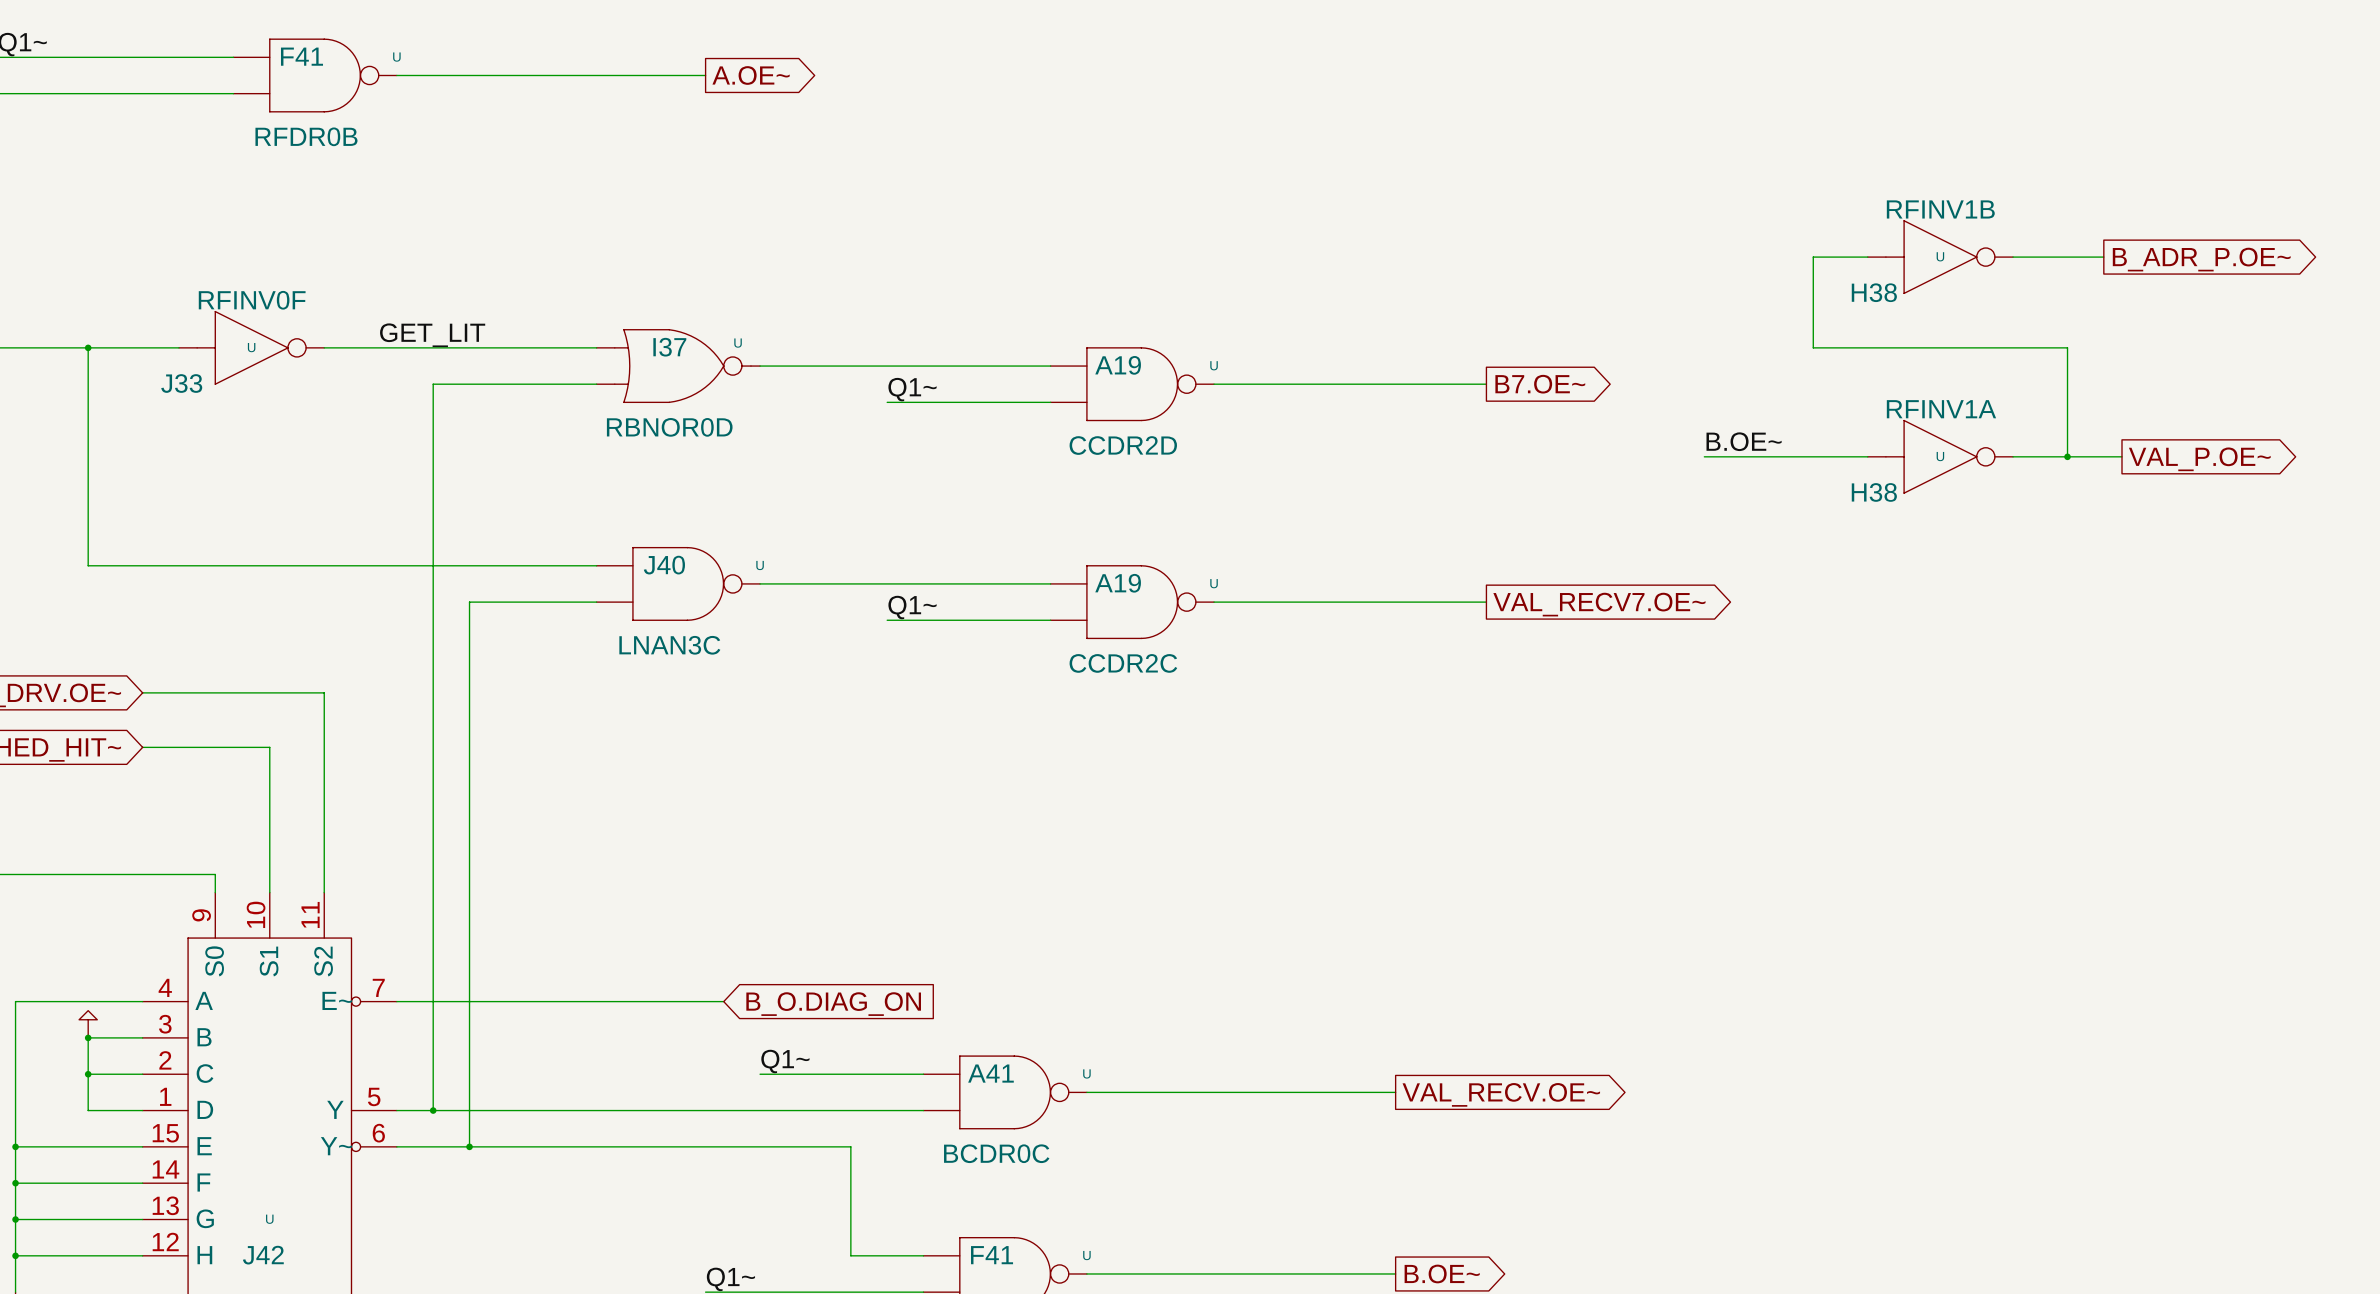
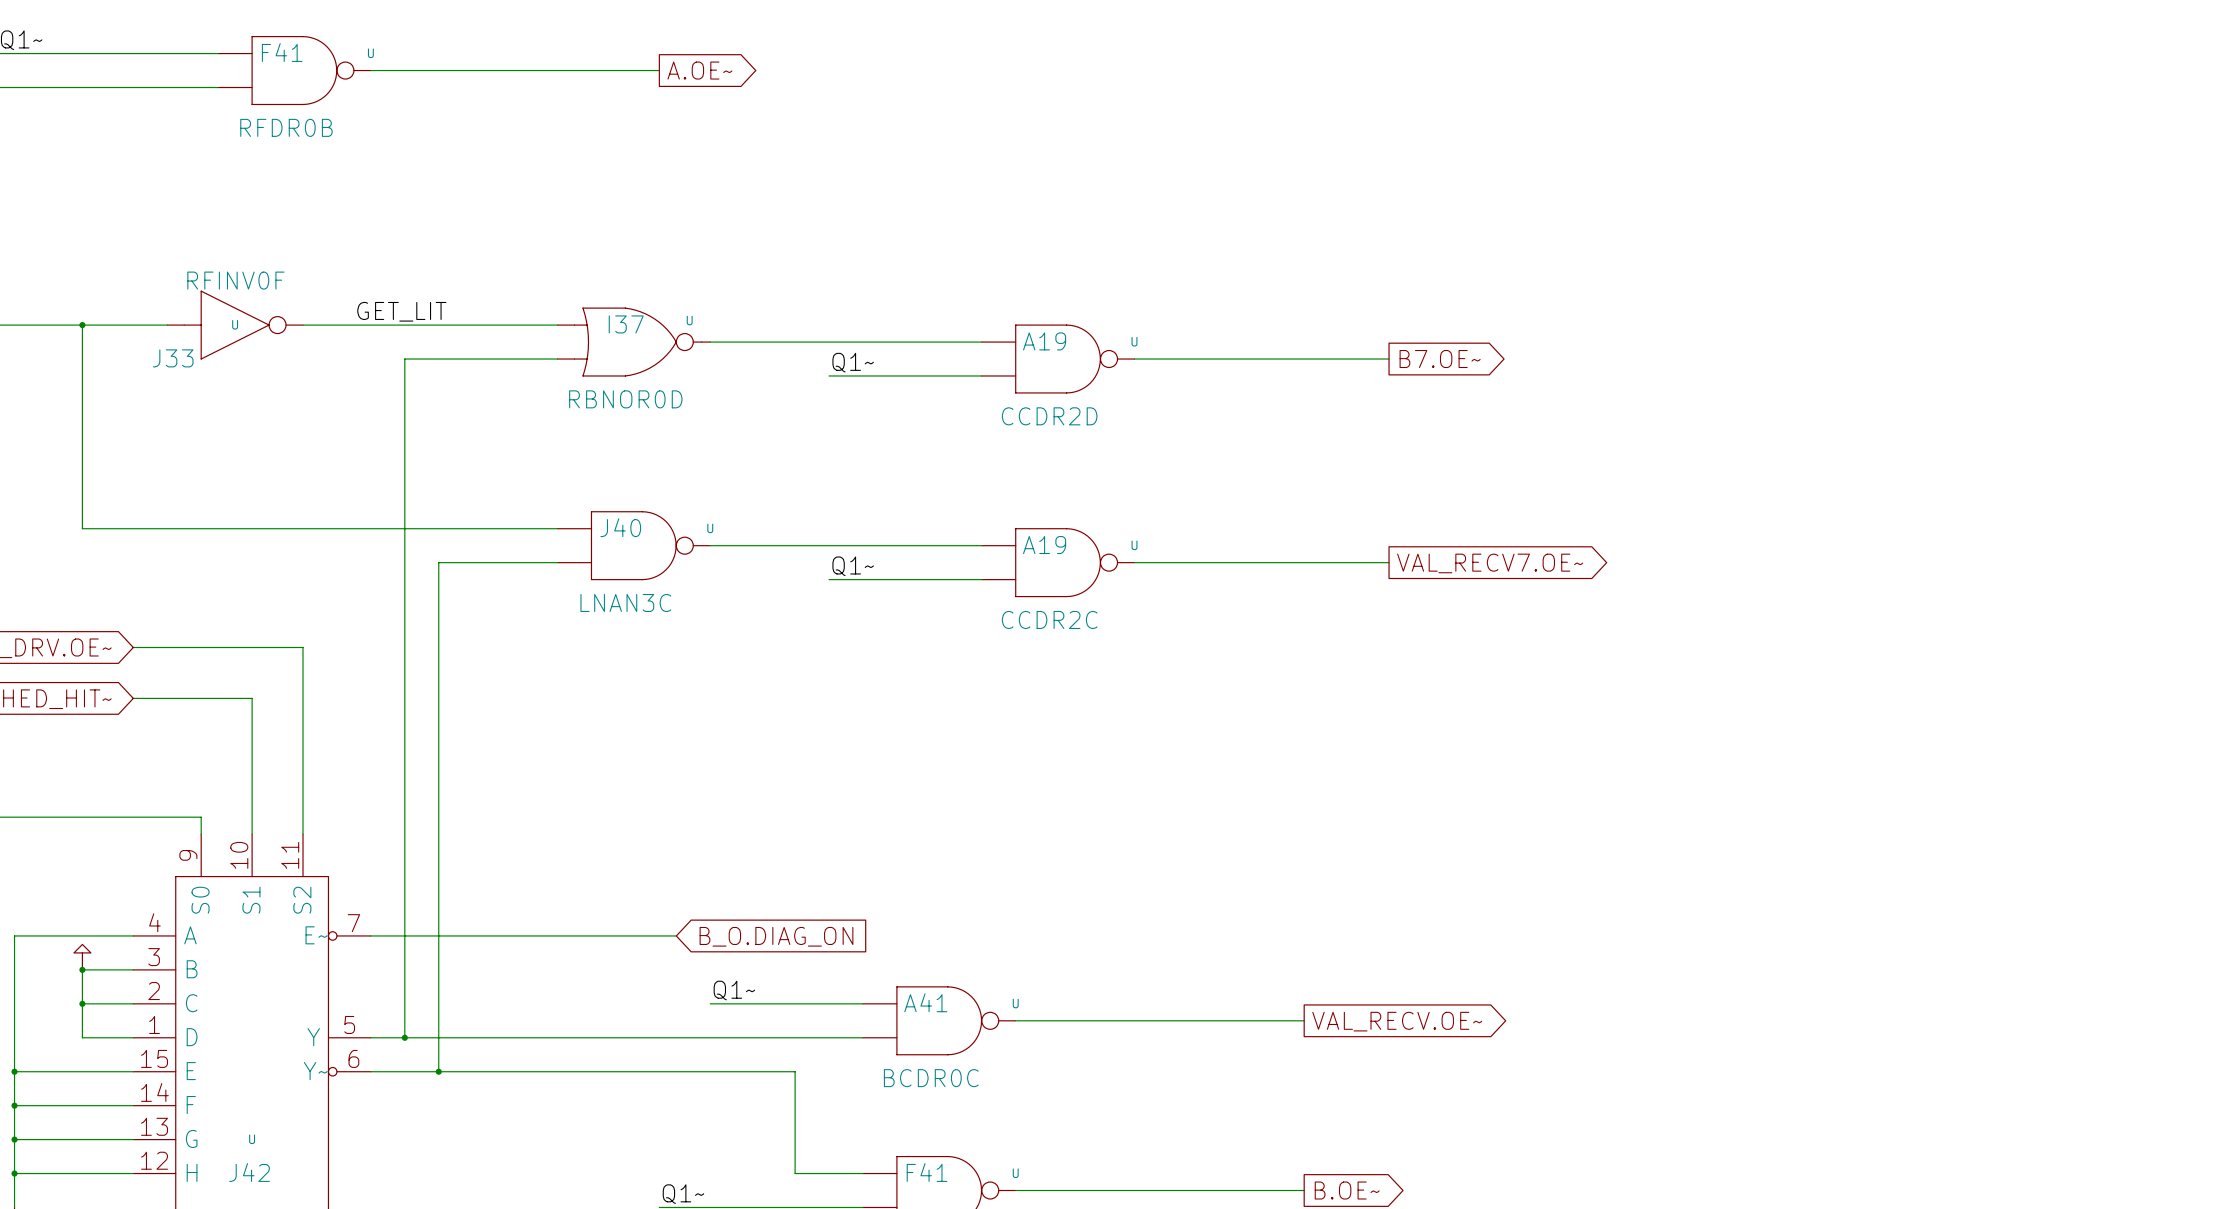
wire: (1867, 257) (1813, 257) (1813, 347) (2067, 347) (2067, 456) -> none
U: (1940, 257) -> none
wire: (2013, 257) (2103, 257) -> none
global label: B_ADR_P.OE~ (2201, 259) -> none
label: B.OE~ (1744, 441) -> none
wire: (1704, 456) (1867, 456) -> none
U: (1940, 456) -> none
wire: (2013, 456) (2121, 456) -> none
junction: (2067, 456) -> none
global label: VAL_P.OE~ (2199, 459) -> none

